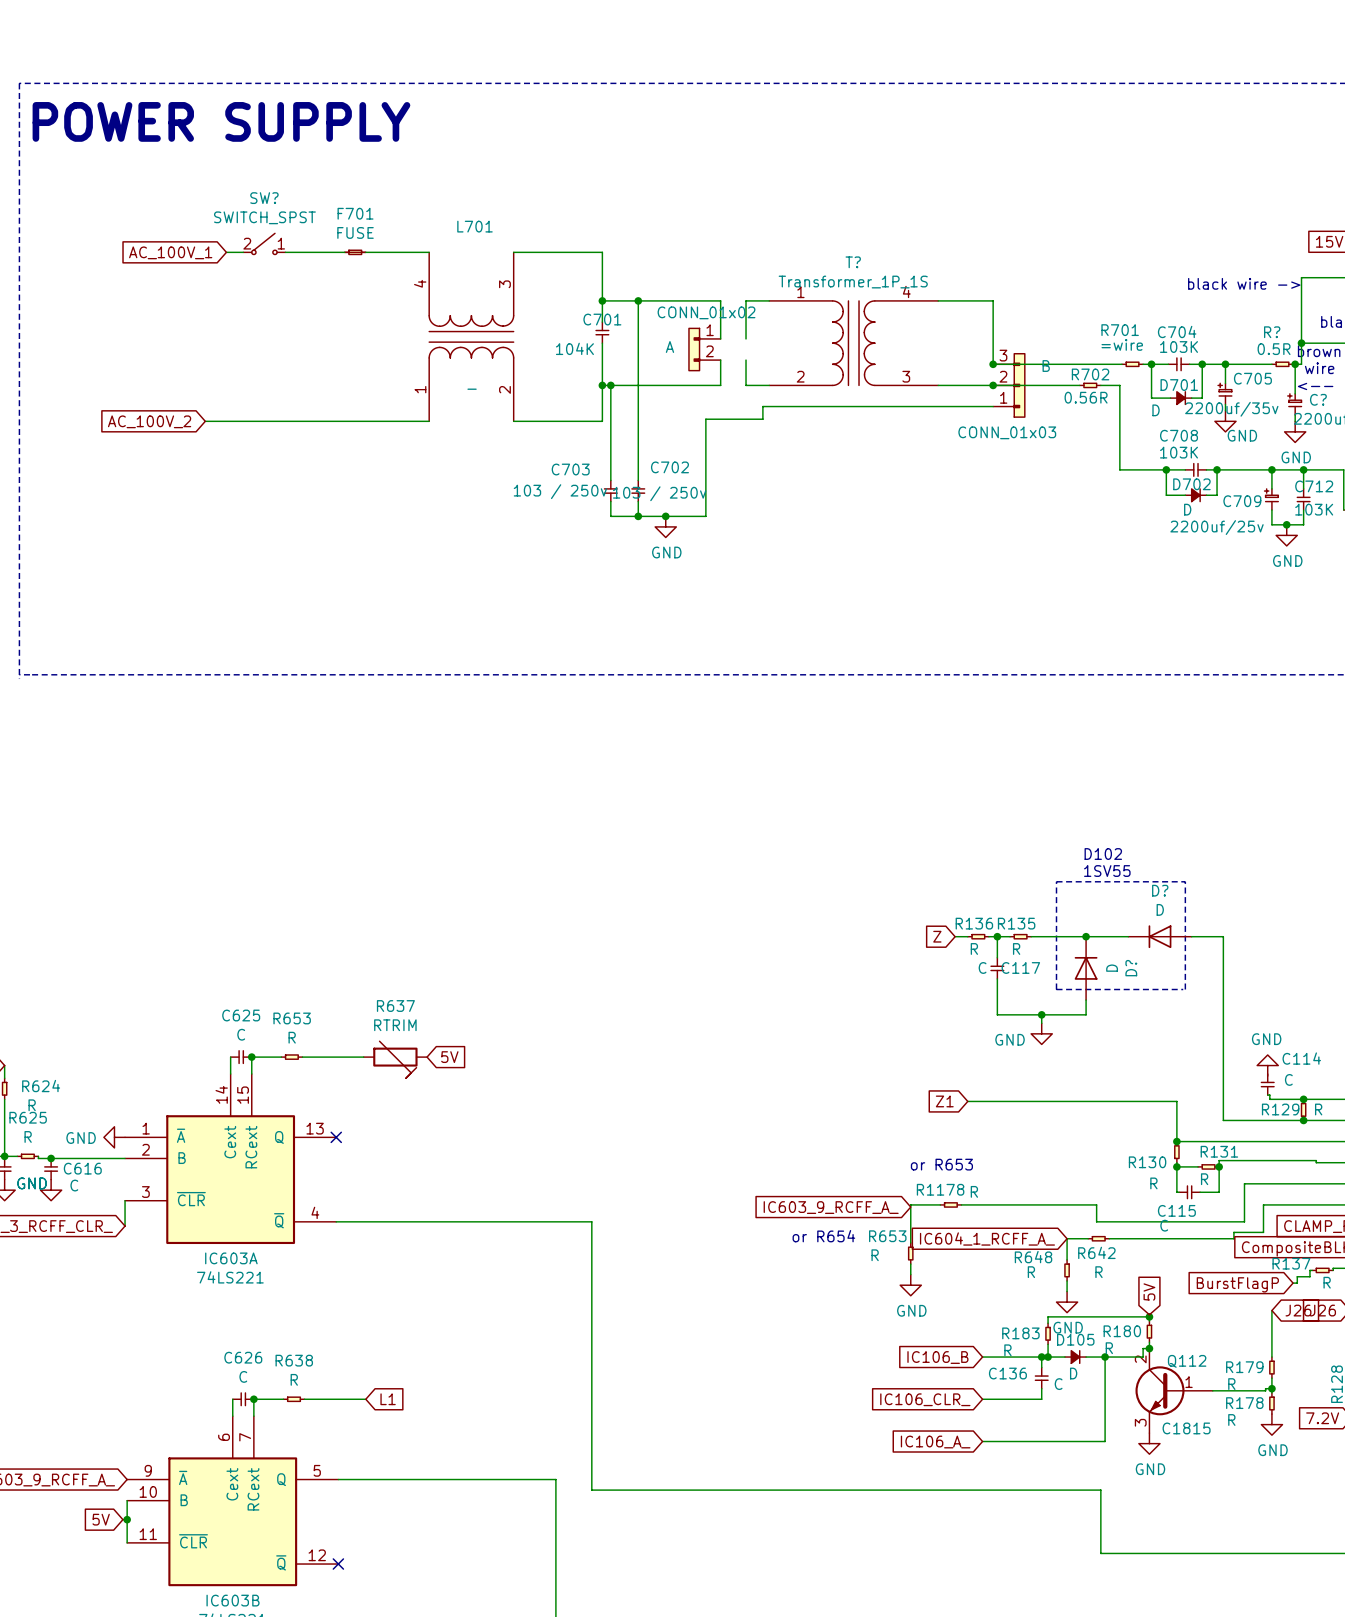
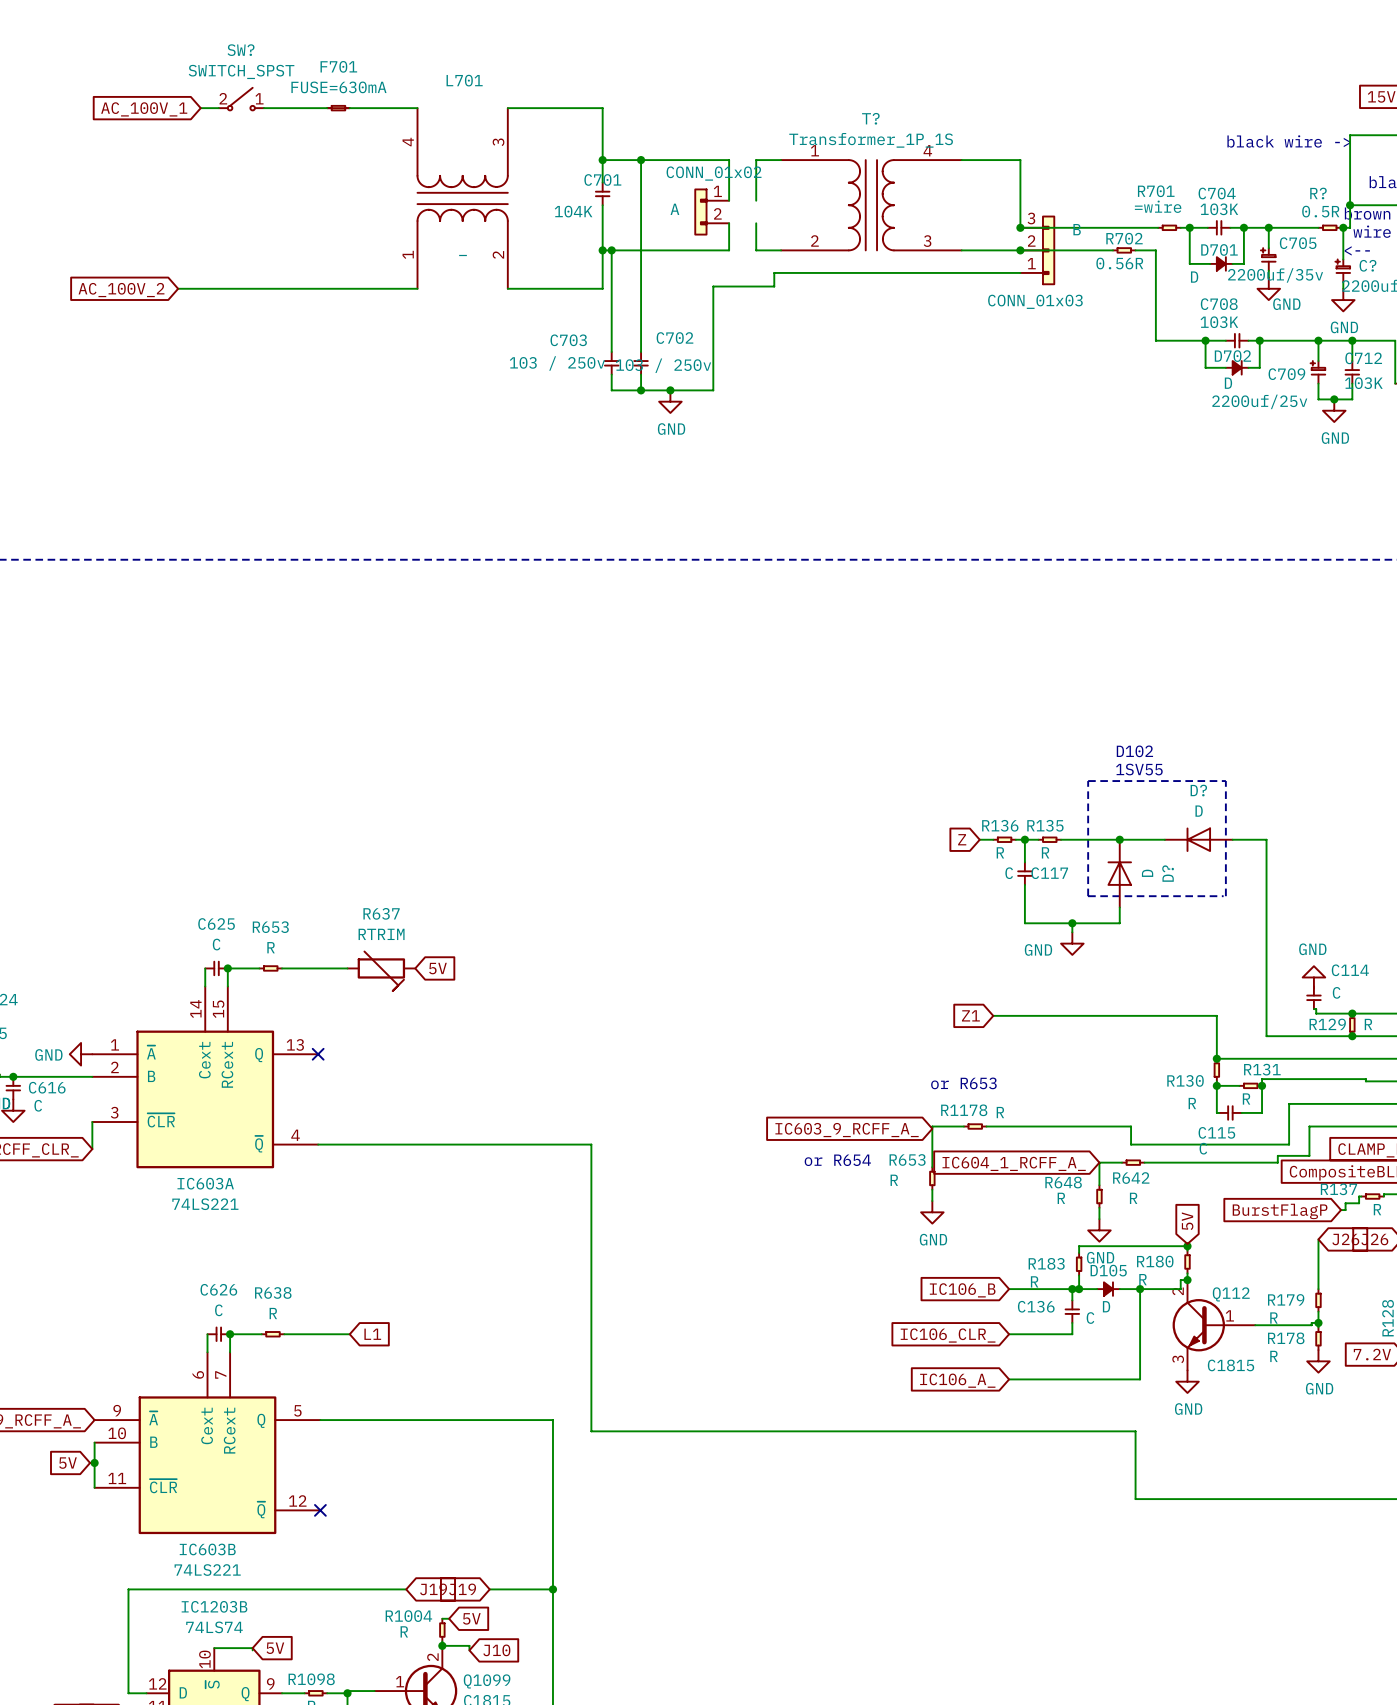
F701 value: FUSE (355, 232) -> FUSE=630mA (338, 87)

